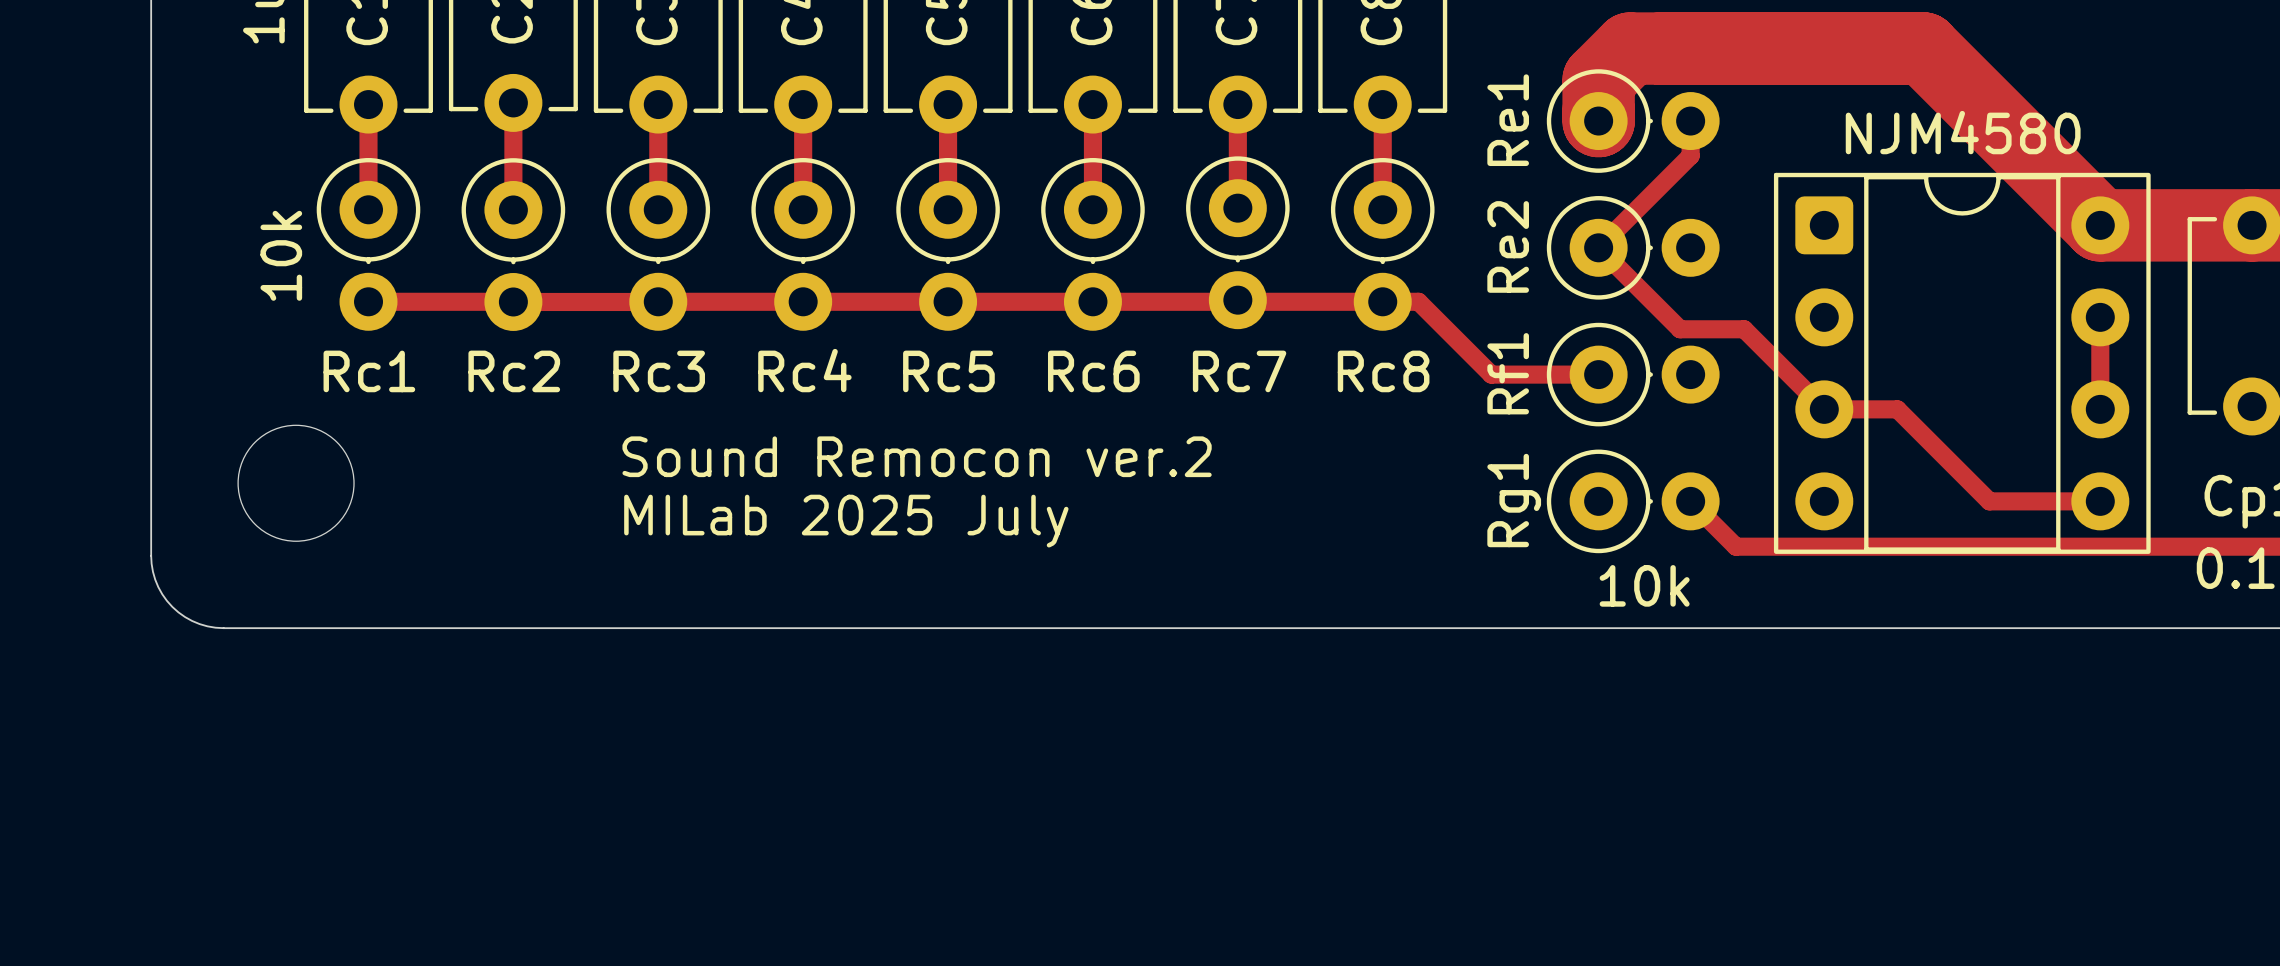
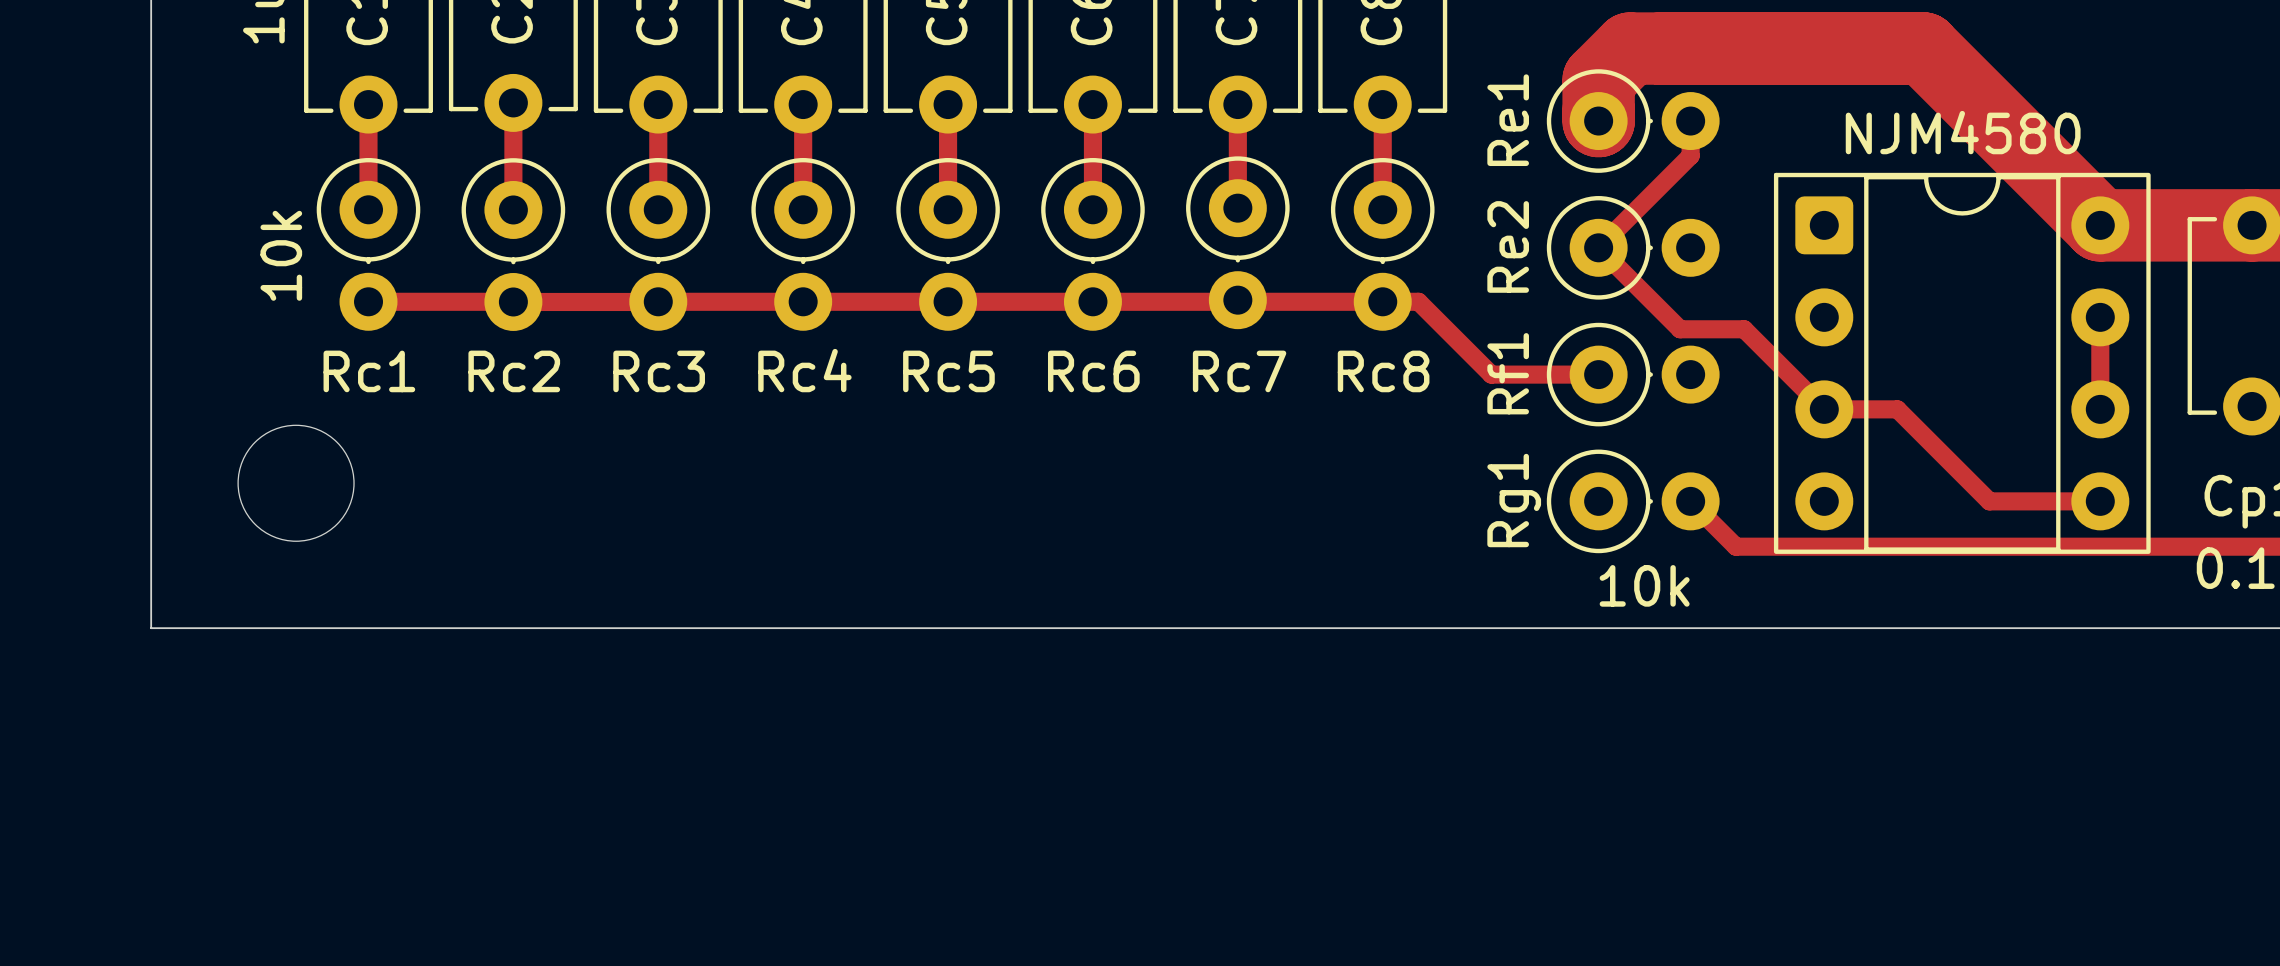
text: Sound Remocon ver.2 (917, 456) -> none
text: MILab 2025 July (846, 521) -> none
board edge: (151, 555) (152, 571) (158, 587) (172, 606) (185, 617) (199, 624) (223, 628) -> (151, 555) (151, 628) (223, 628)

